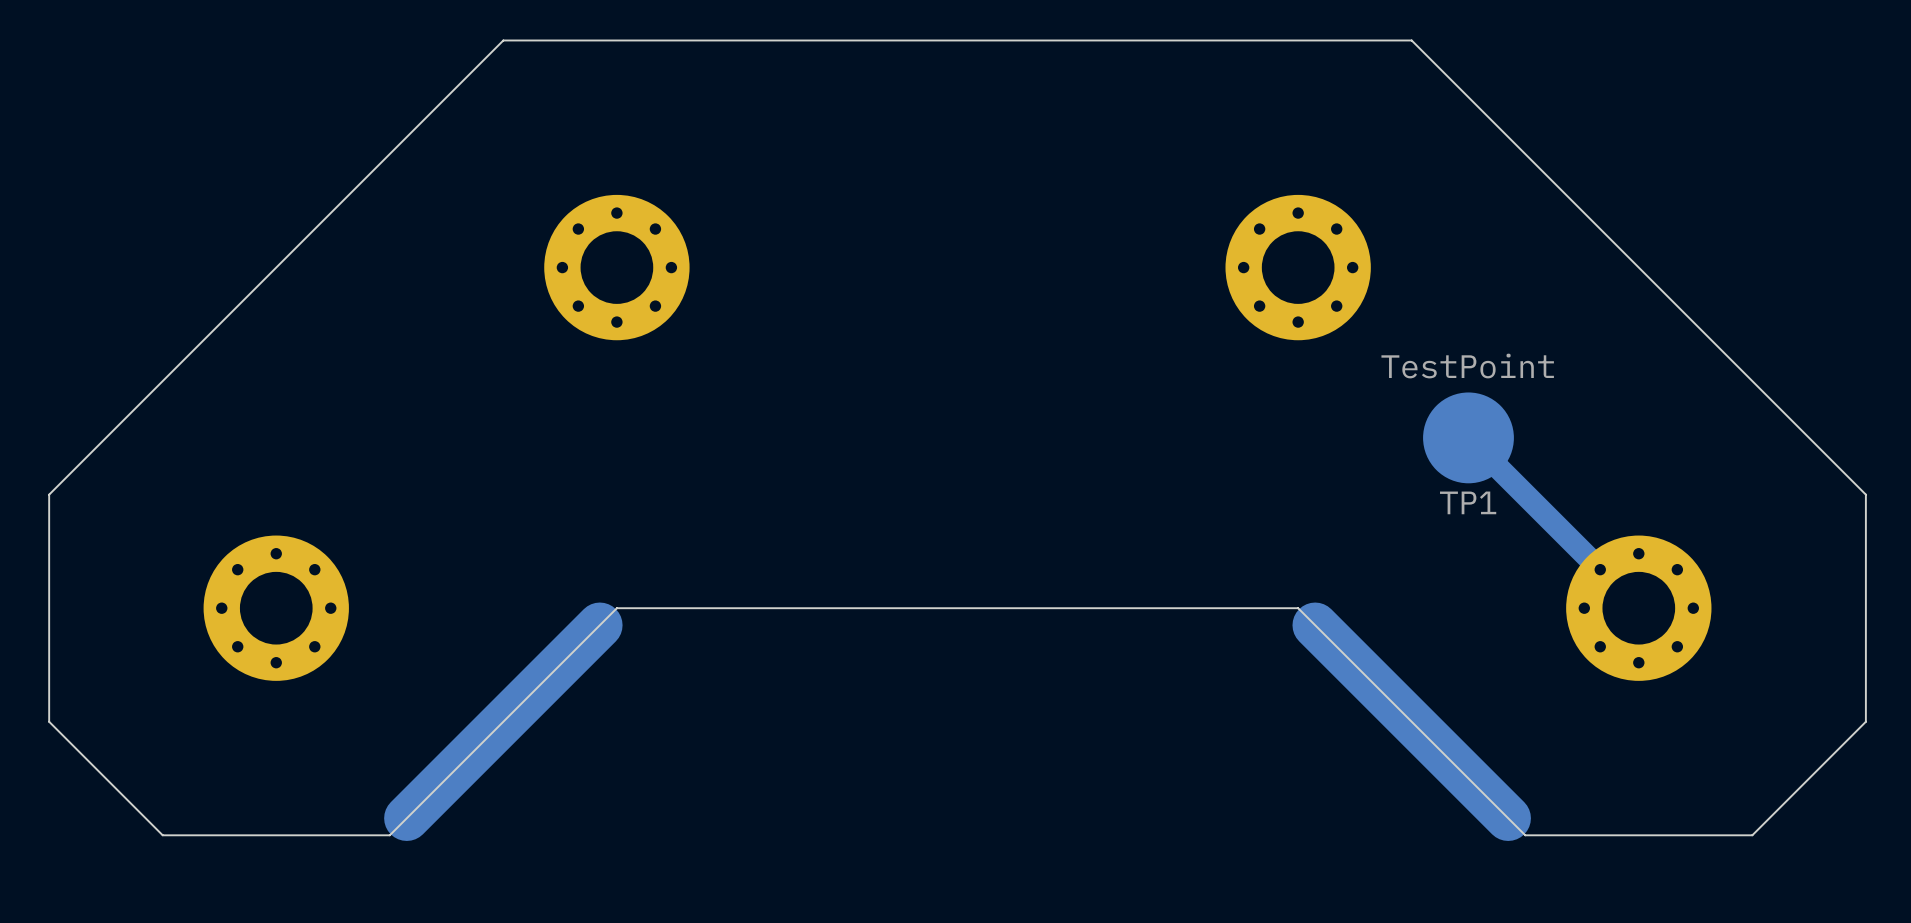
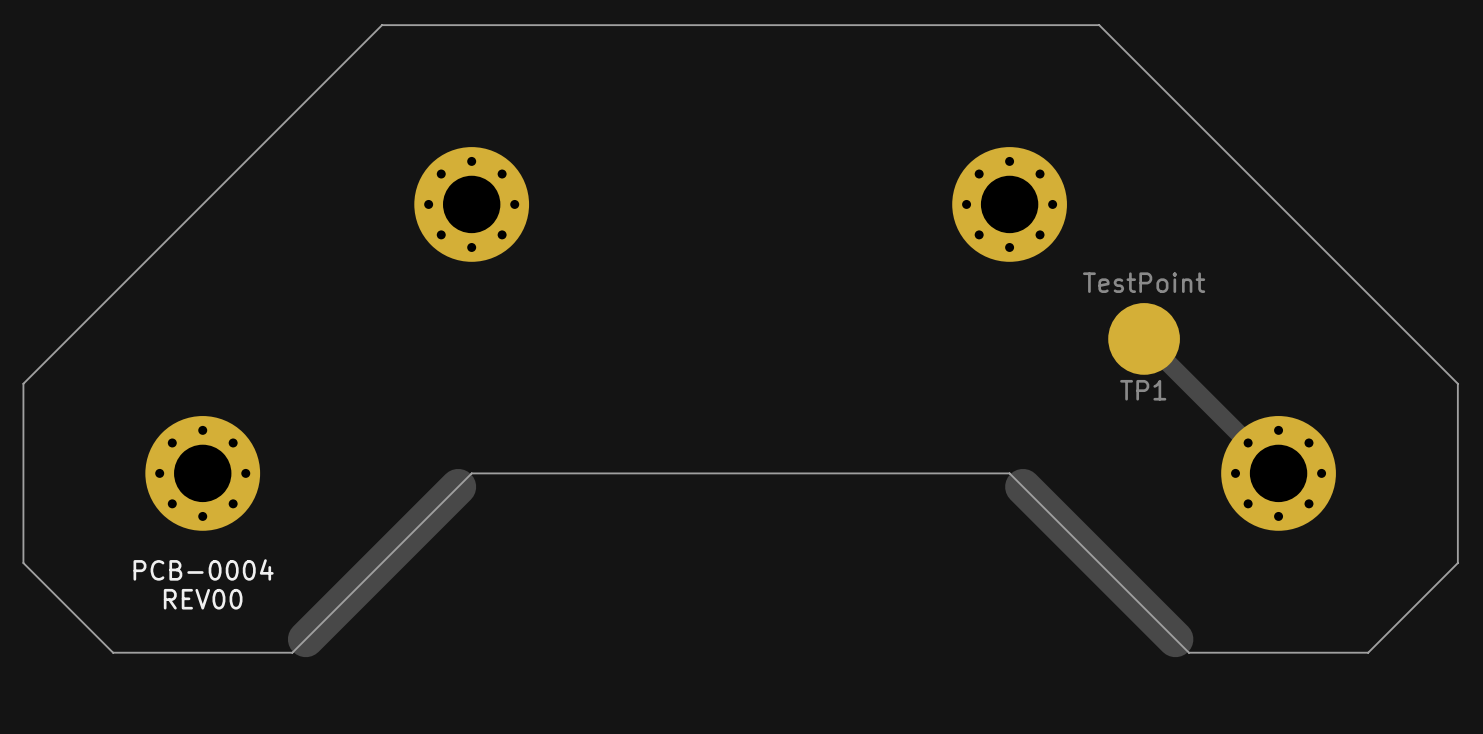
text: none -> PCB-0004 (203, 569)
text: none -> REV00 (203, 599)

